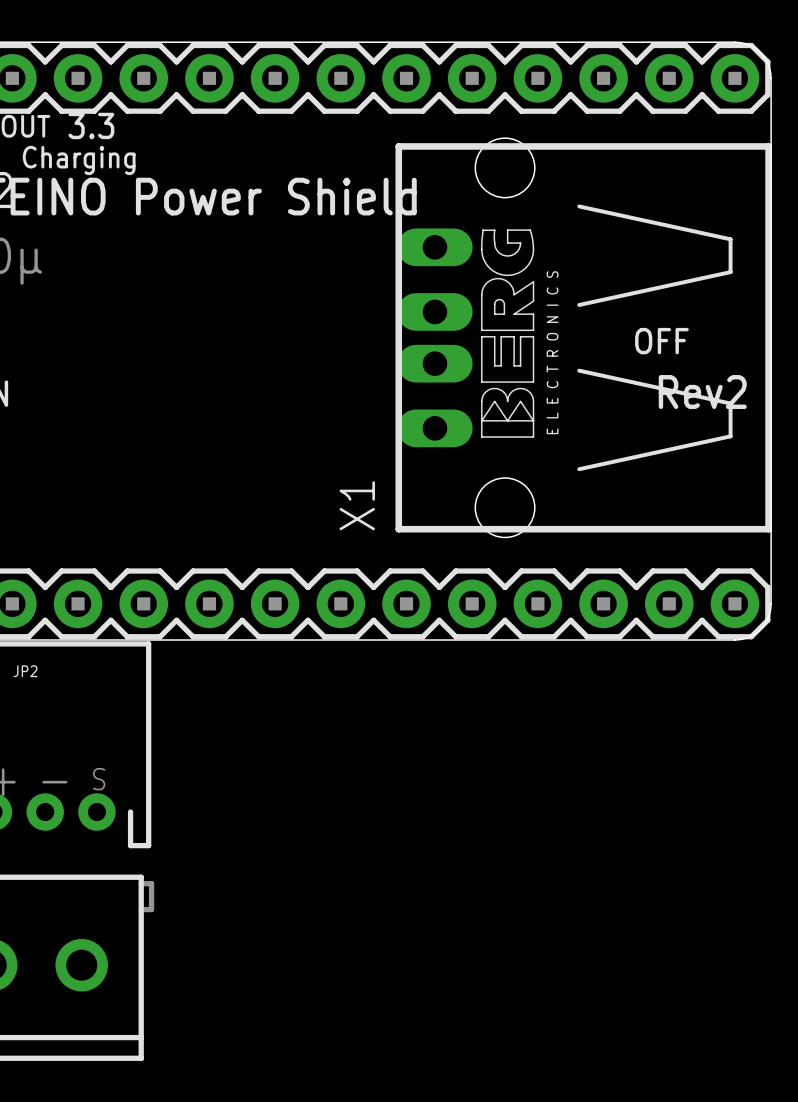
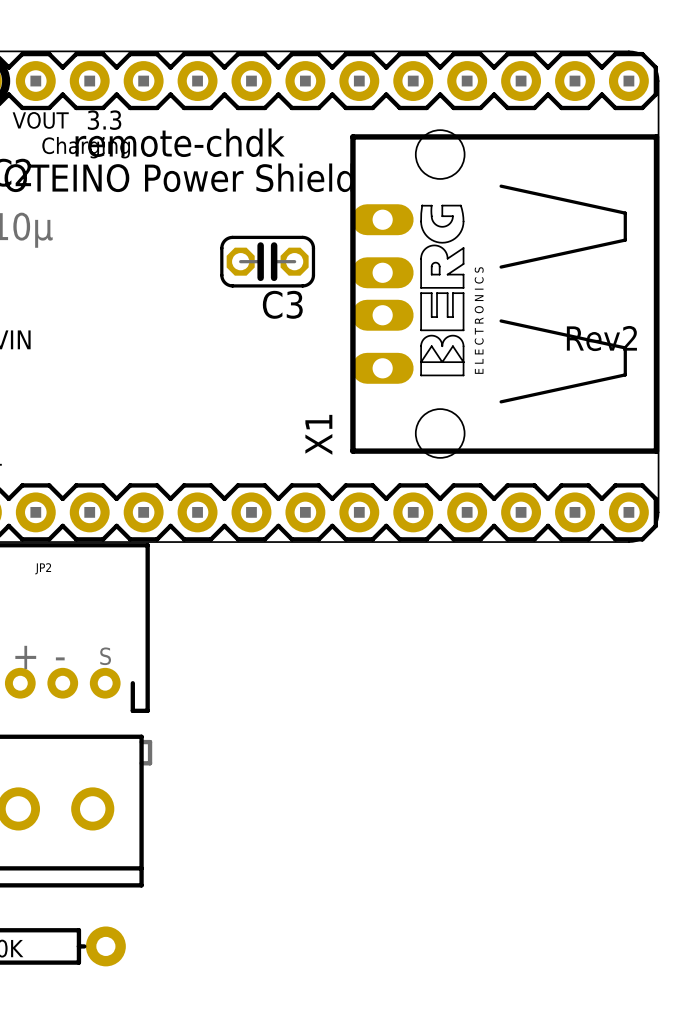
text: none -> remote-chdk (180, 142)
C3: none -> (267, 261)
text: OFF (661, 341) -> none

